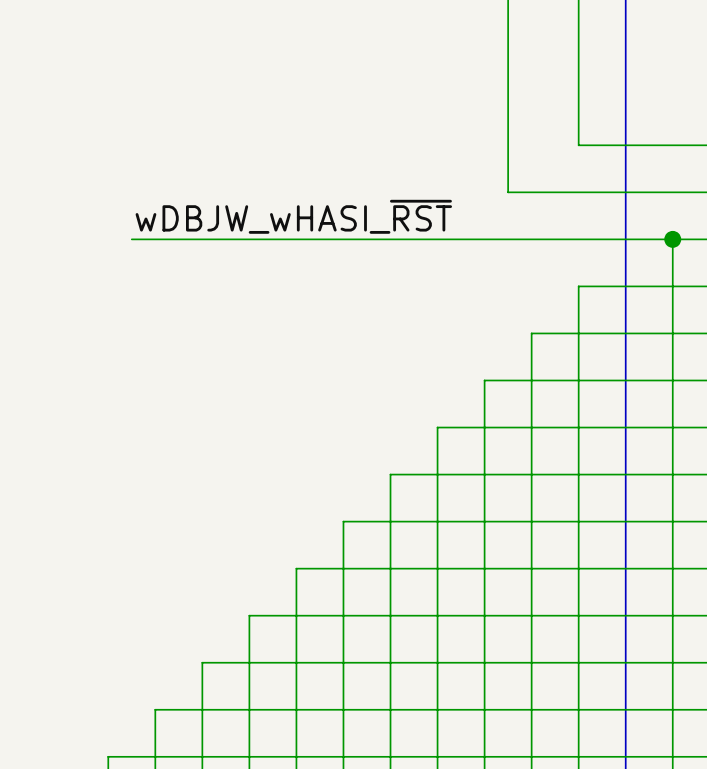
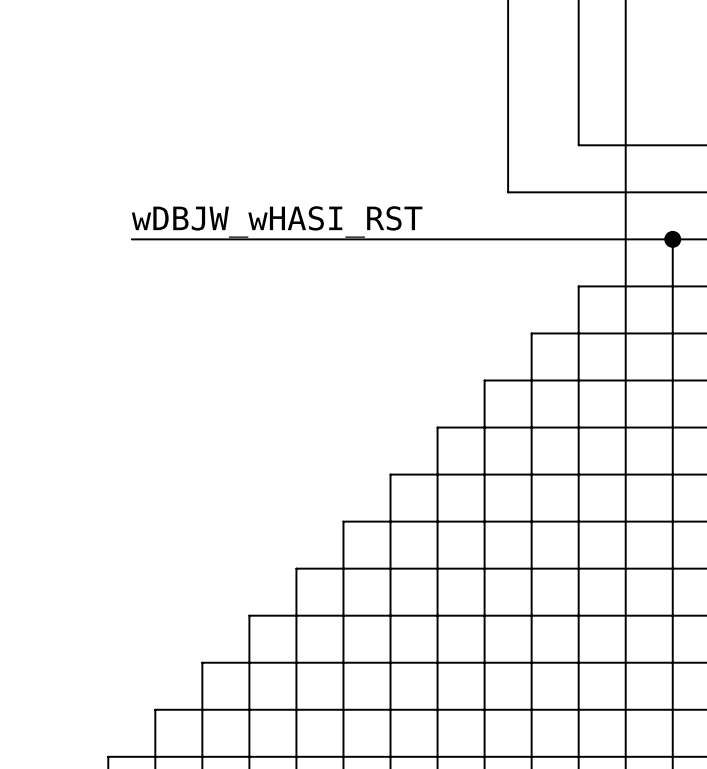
label: wDBJW_wHASI_~{RST} (293, 216) -> wDBJW_wHASI_RST (277, 221)

